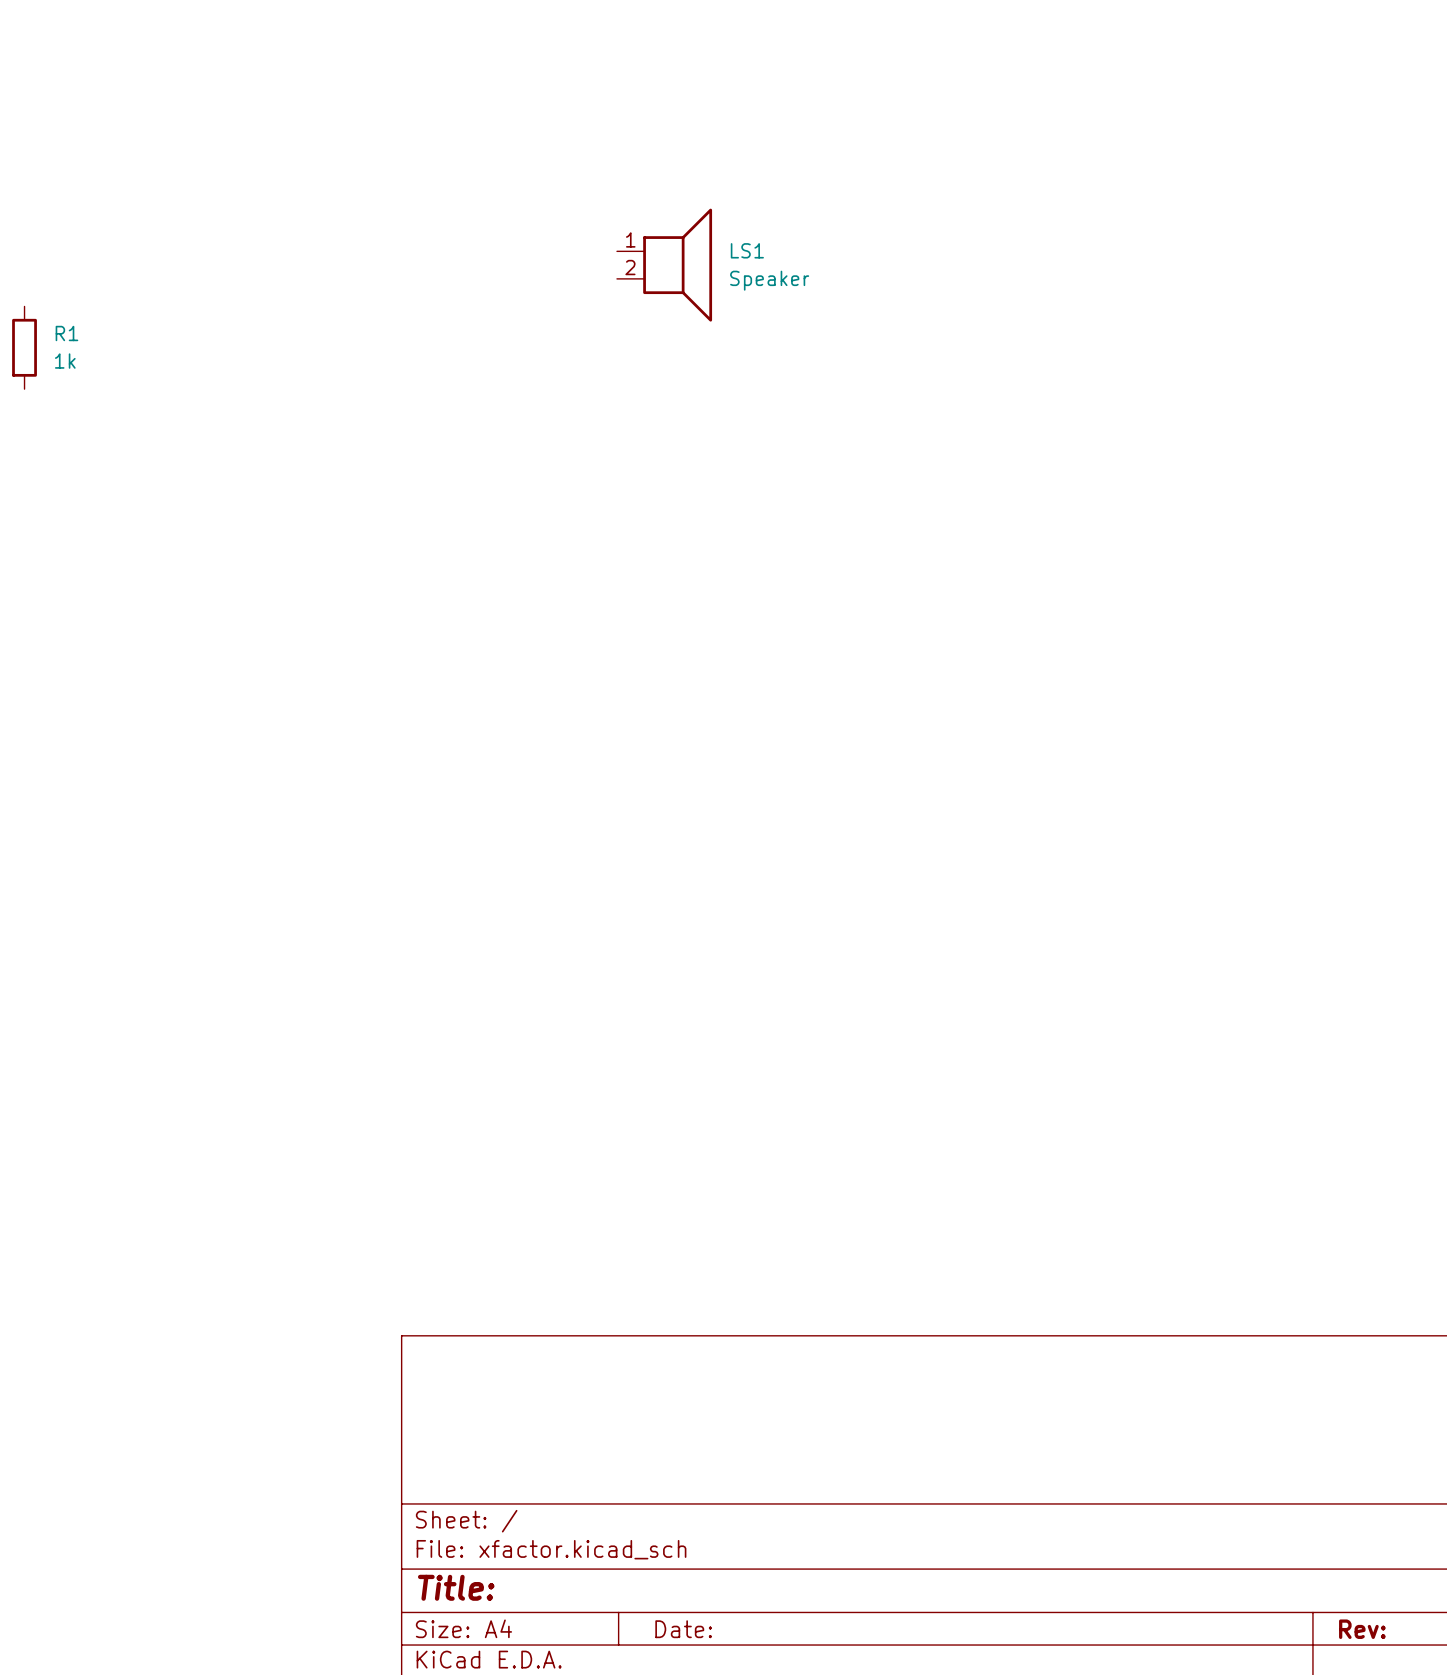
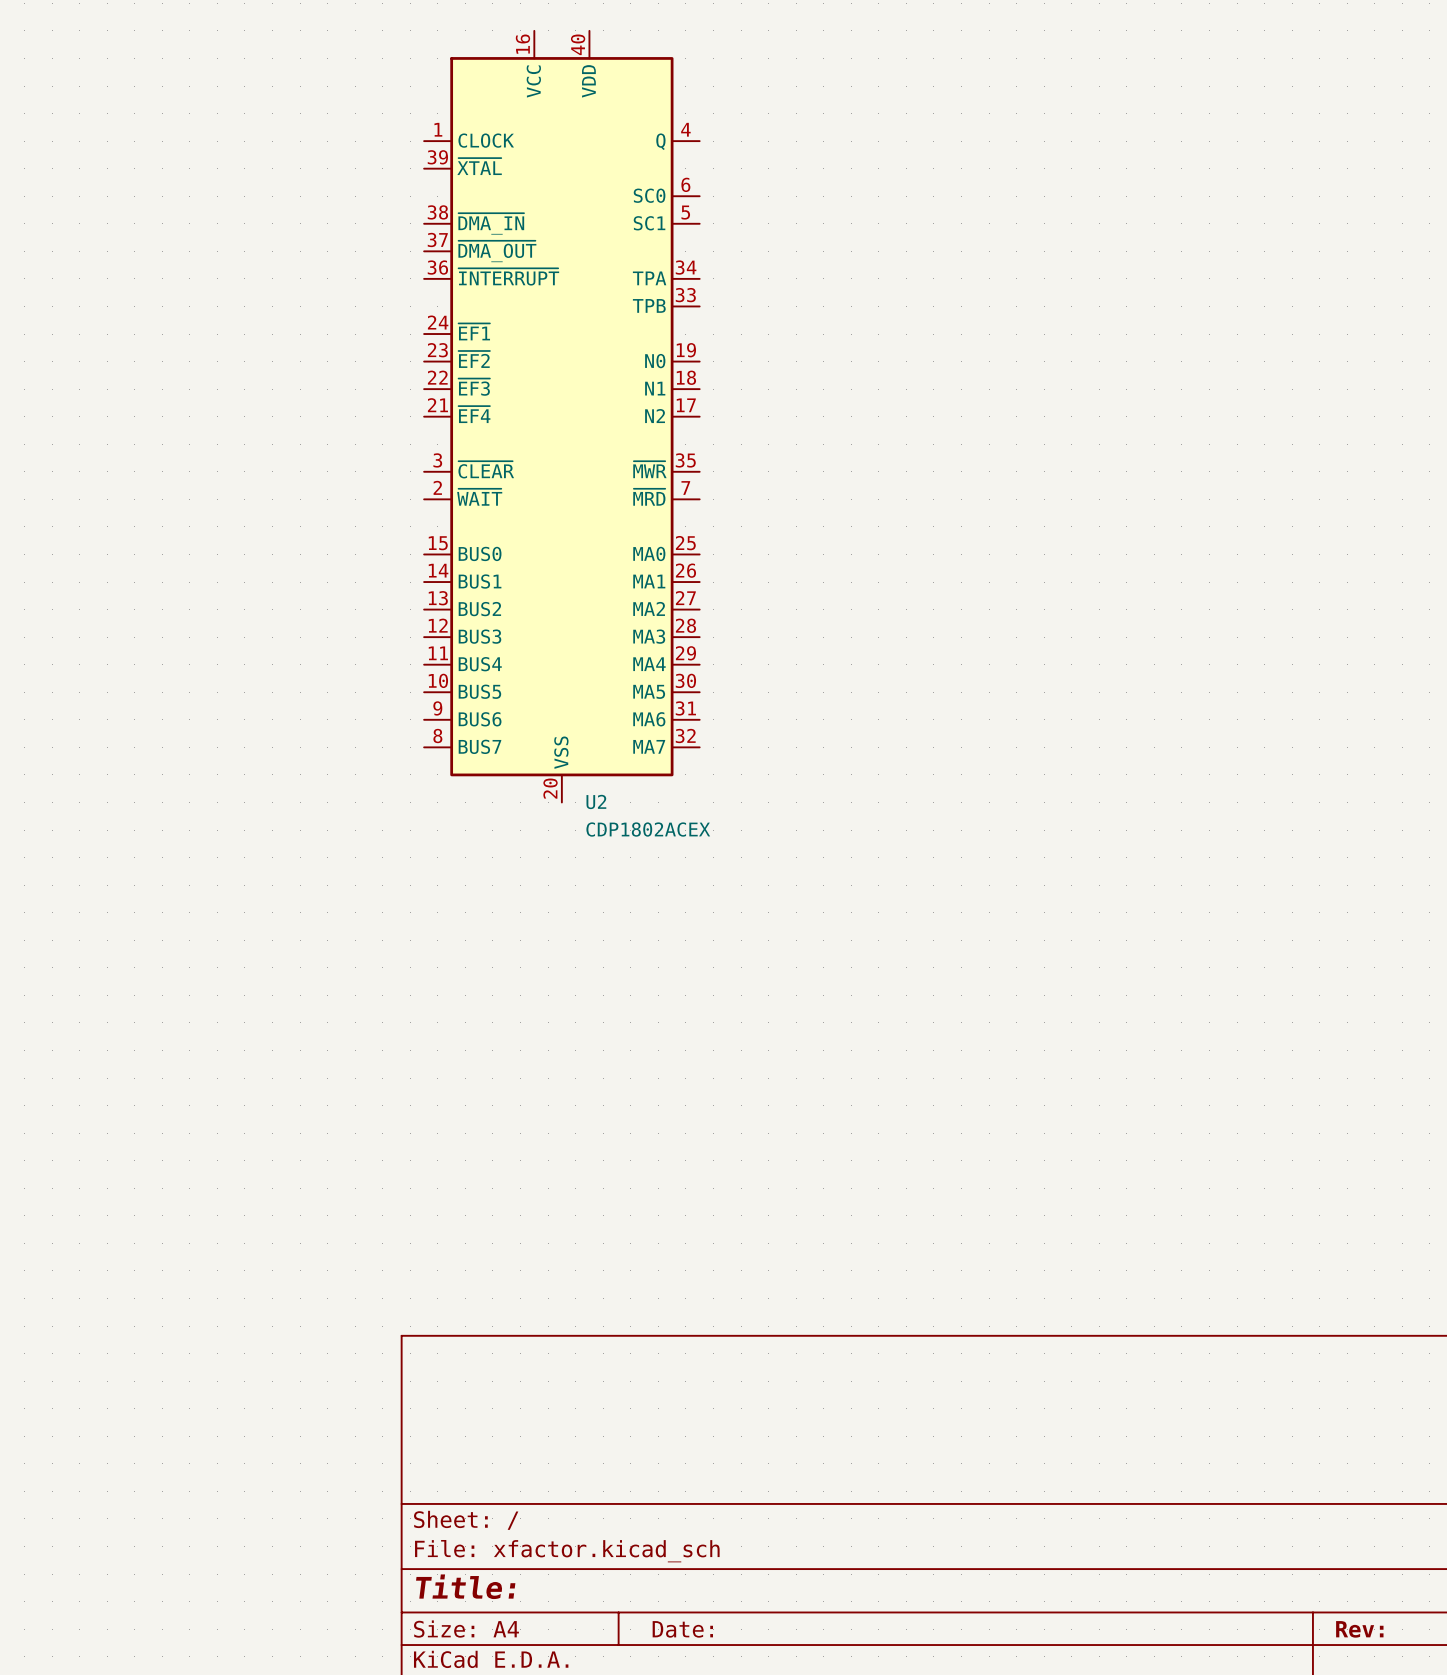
LS1: Speaker (664, 265) -> none
R1: 1k (24, 347) -> none
U2: none -> CDP1802ACEX (561, 416)

